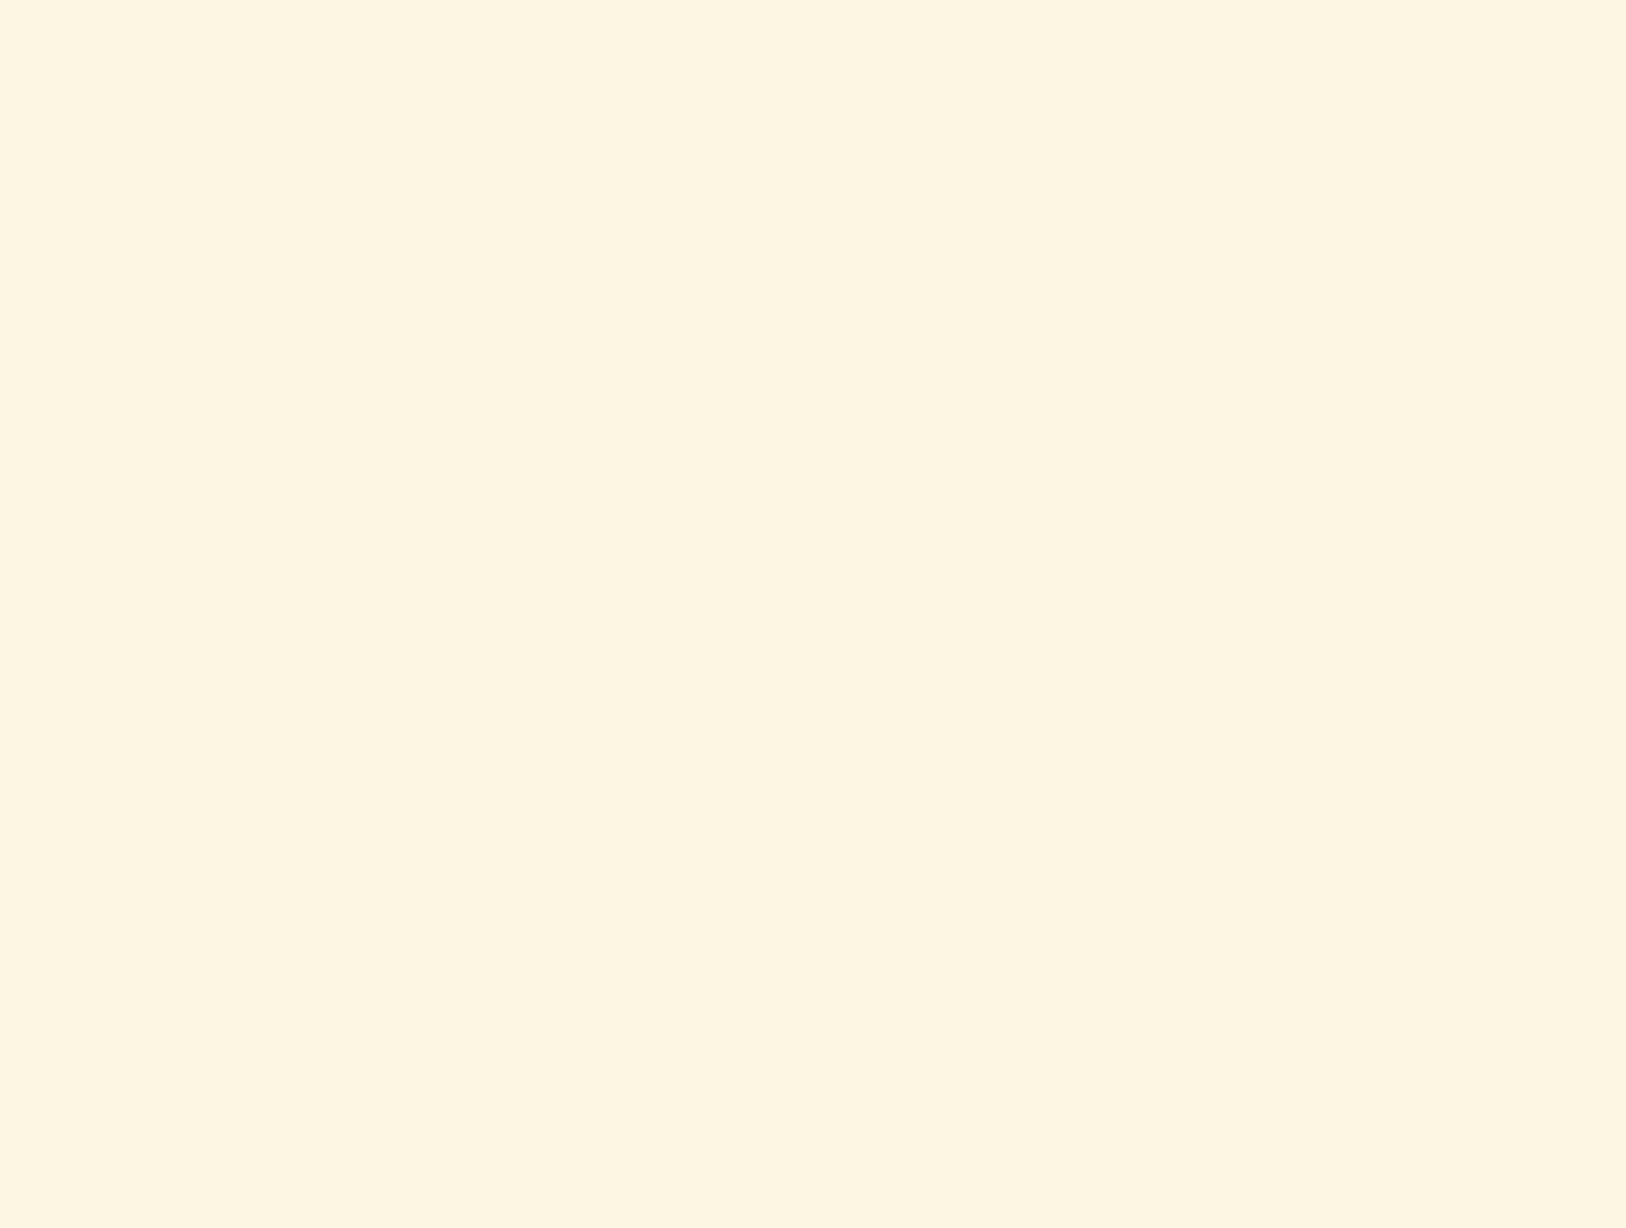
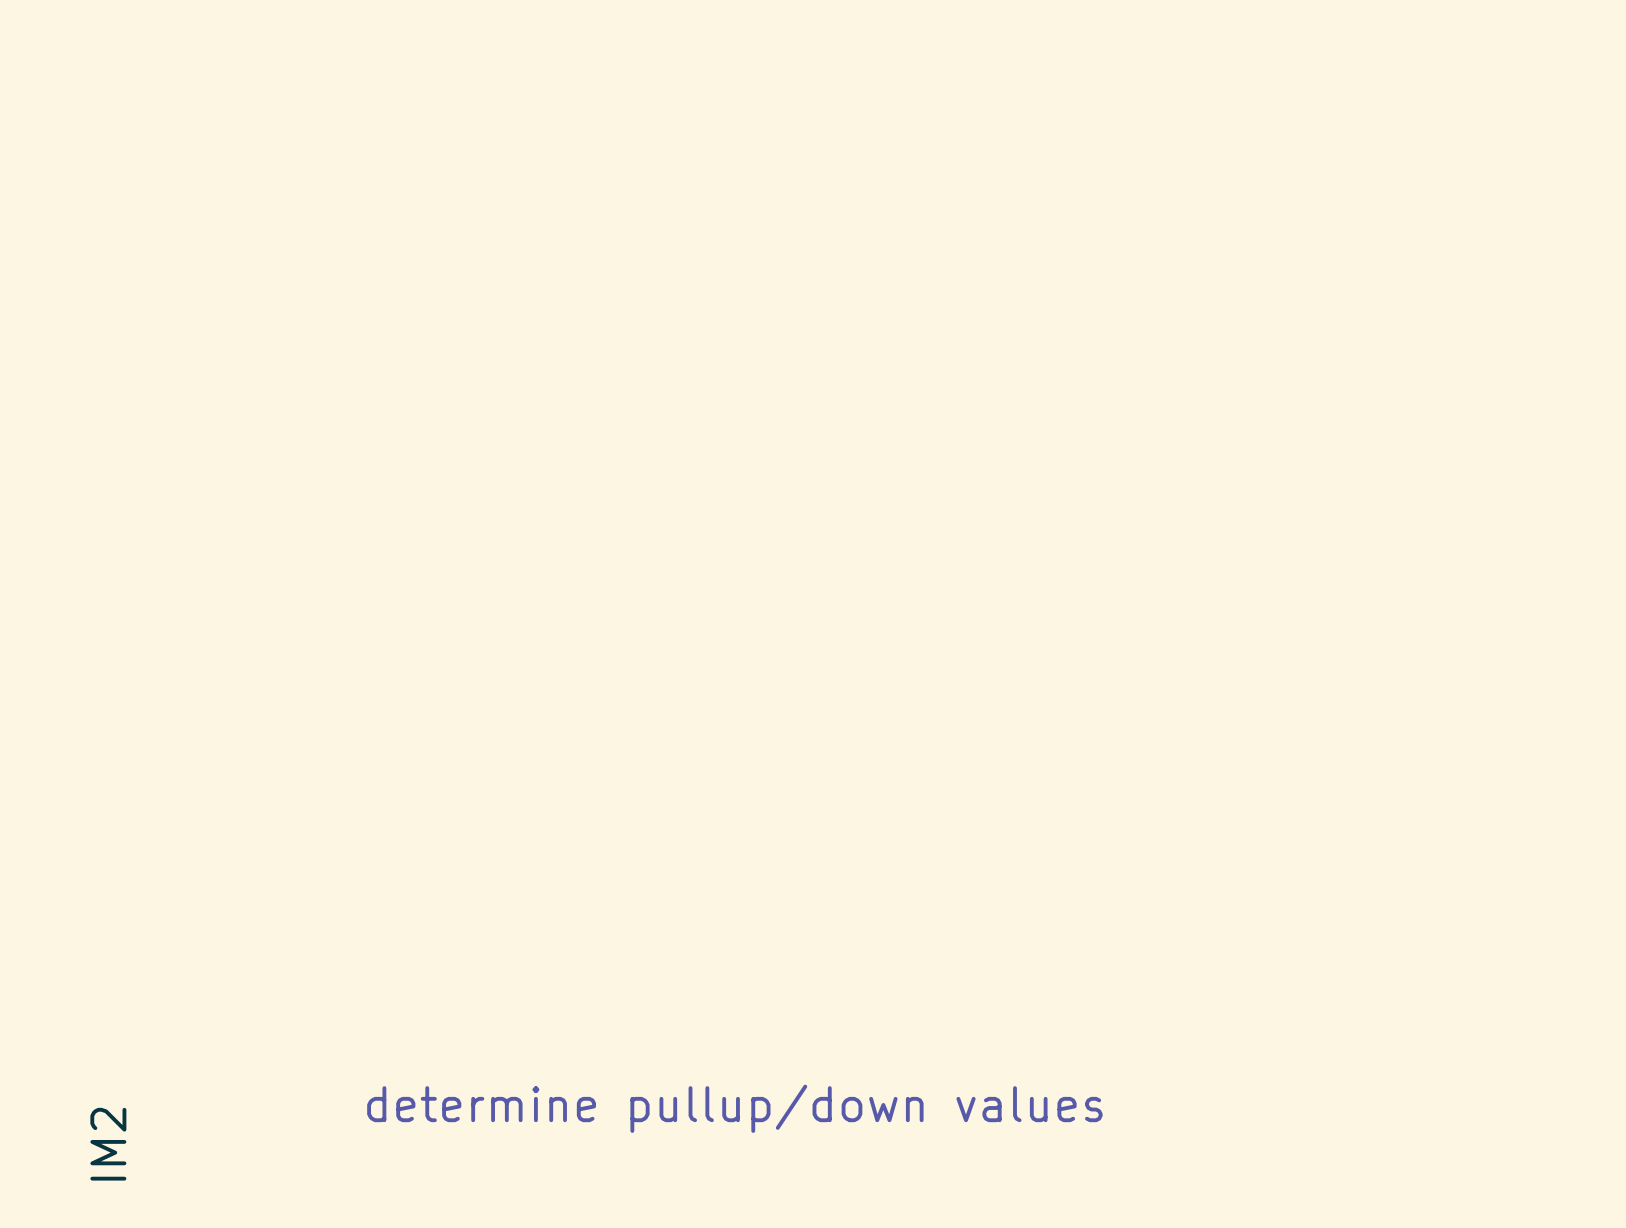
text: none -> determine pullup/down values (734, 1108)
label: none -> IM2 (108, 1144)

